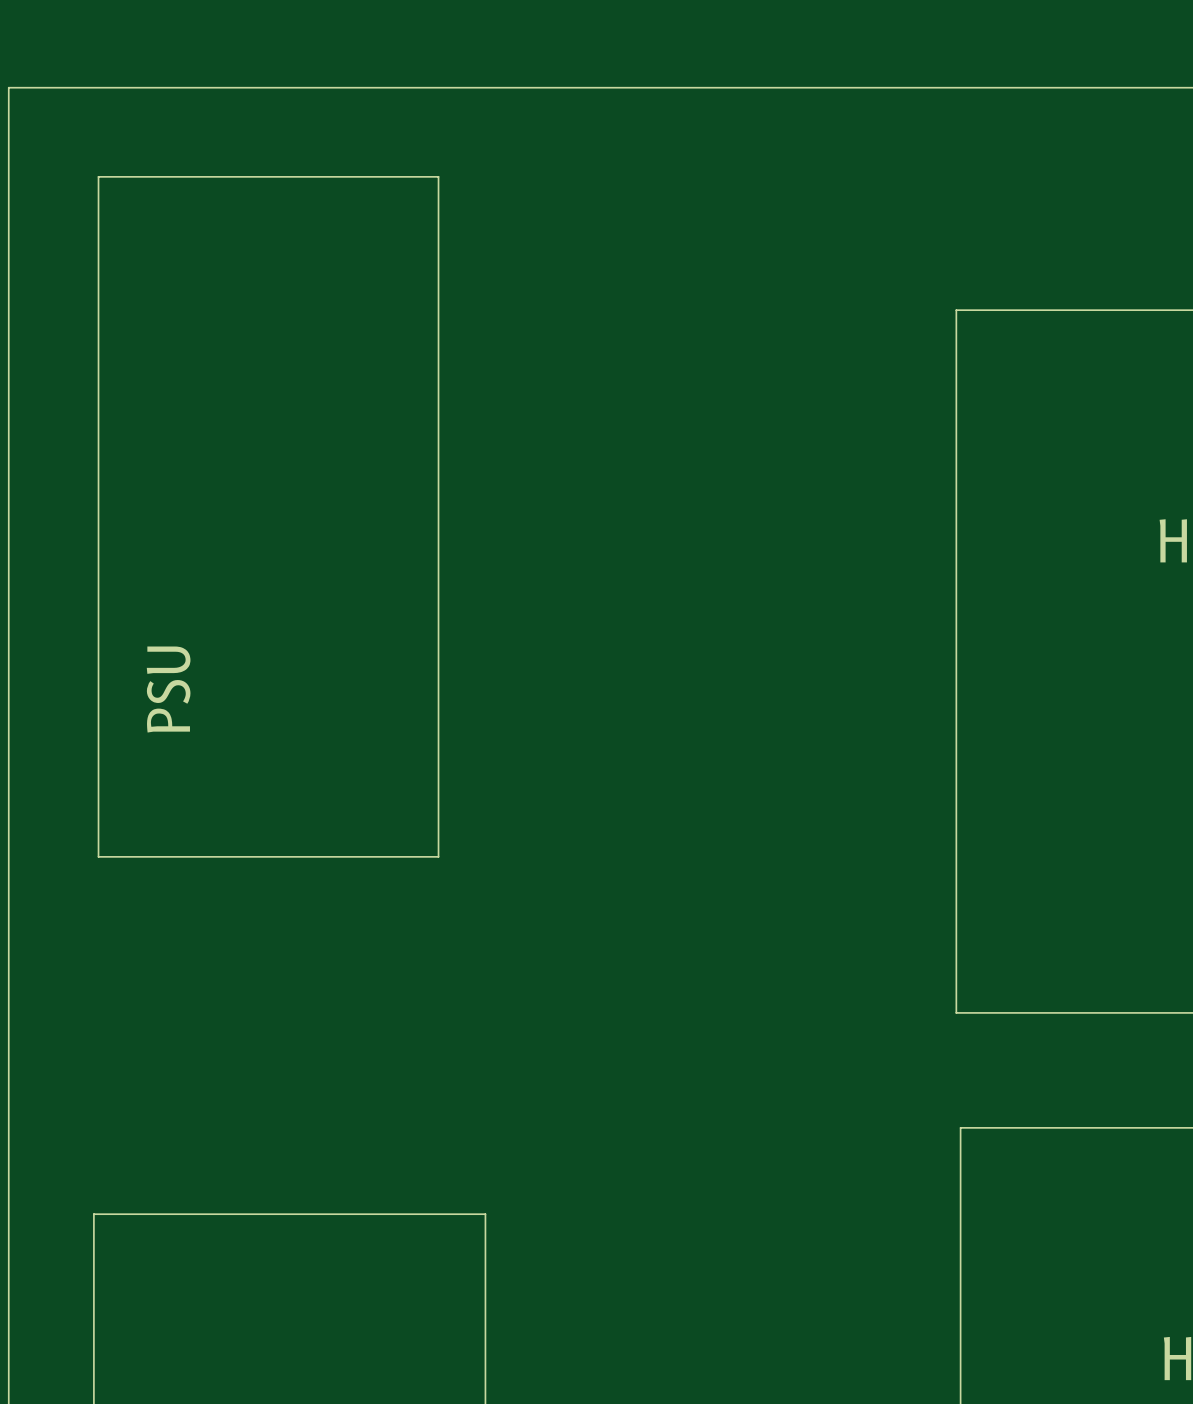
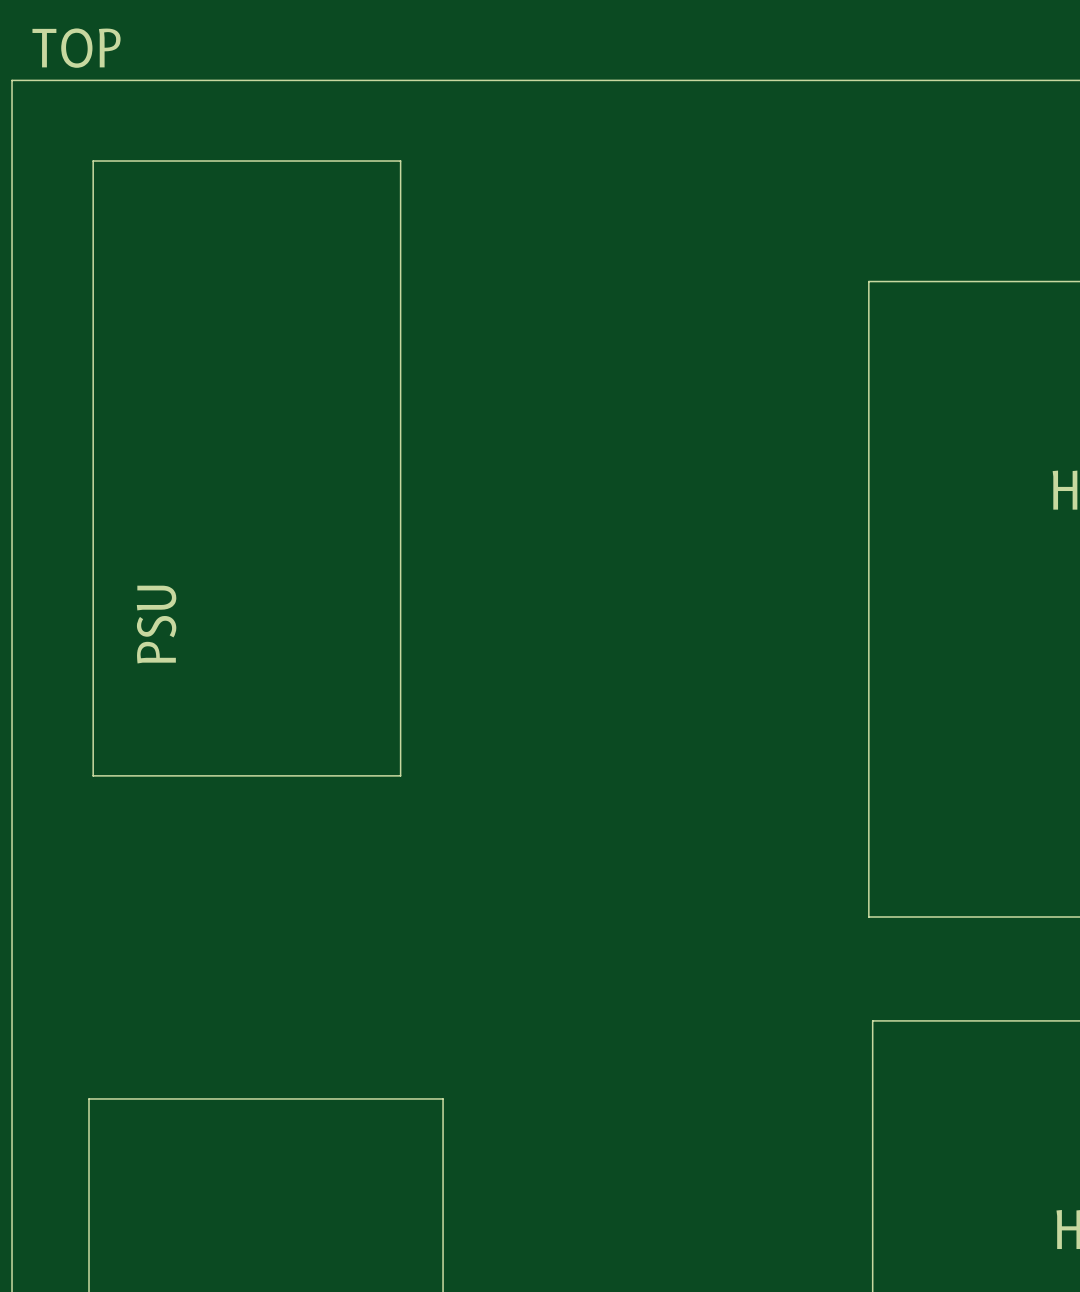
text: none -> TOP (76, 48)

